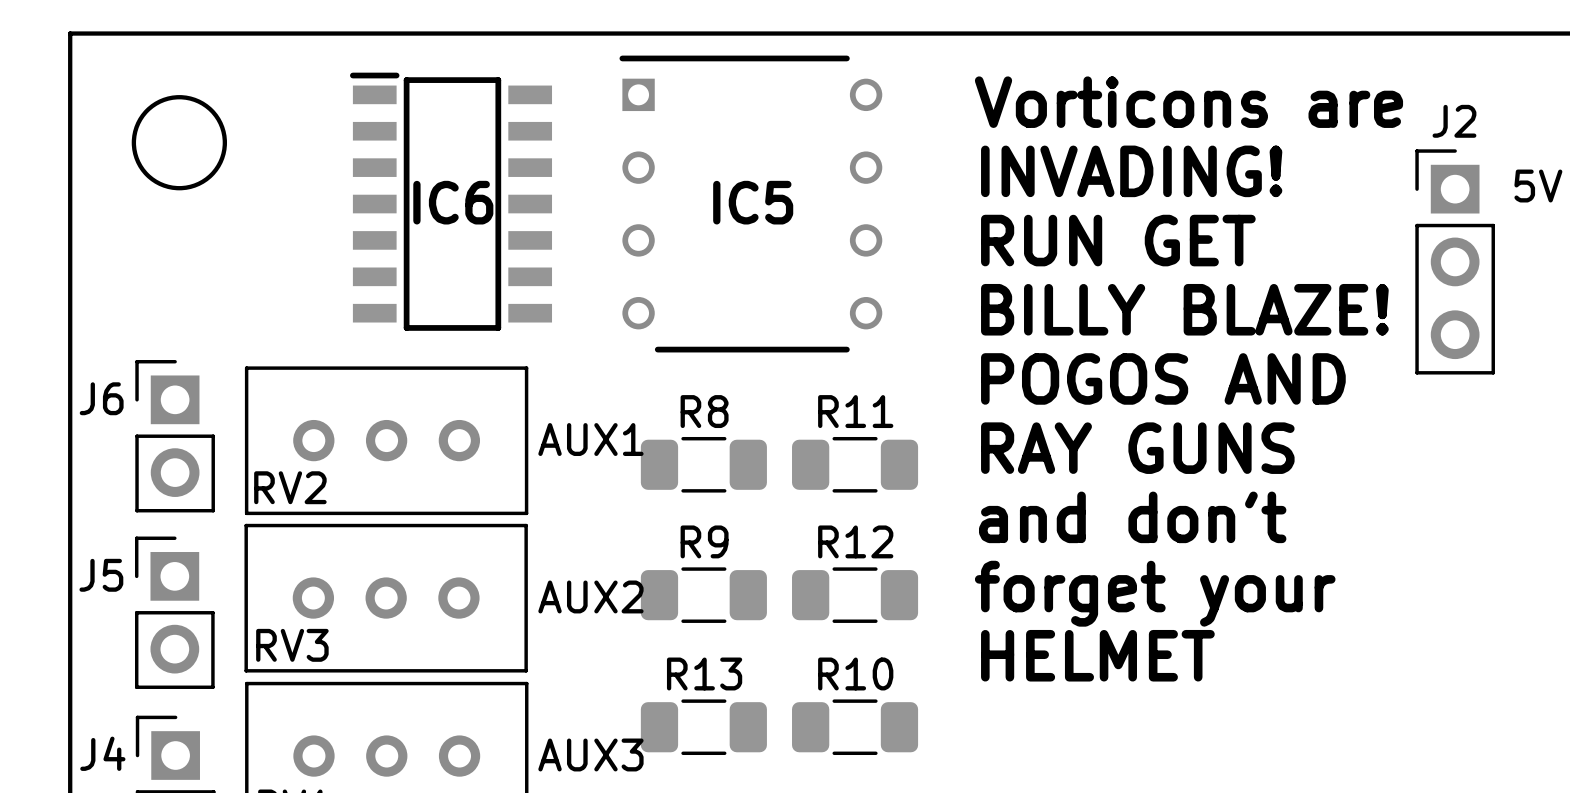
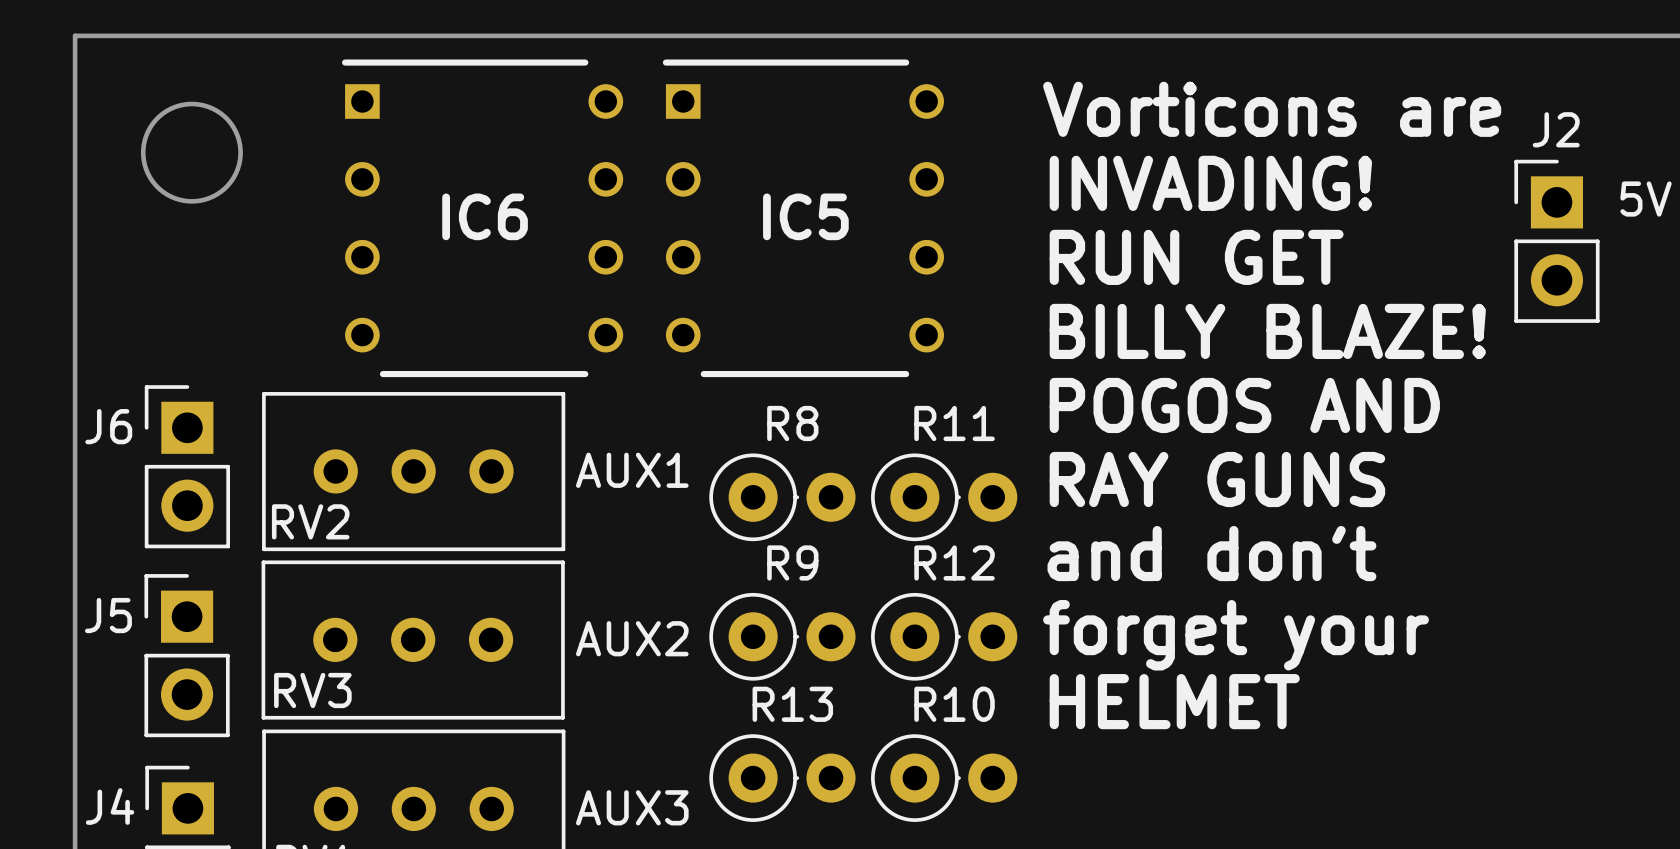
IC6 footprint: [350, 72, 553, 331] -> [342, 59, 624, 378]
J2 footprint: [1415, 149, 1495, 375] -> [1514, 159, 1600, 323]
R8 footprint: [640, 436, 767, 493] -> [709, 453, 856, 542]
R11 footprint: [792, 436, 919, 493] -> [871, 453, 1018, 542]
R9 footprint: [640, 567, 767, 623] -> [709, 592, 856, 681]
R12 footprint: [792, 567, 919, 623] -> [871, 592, 1018, 681]
R13 footprint: [640, 699, 767, 756] -> [709, 734, 856, 822]
R10 footprint: [792, 699, 919, 756] -> [871, 734, 1018, 822]

